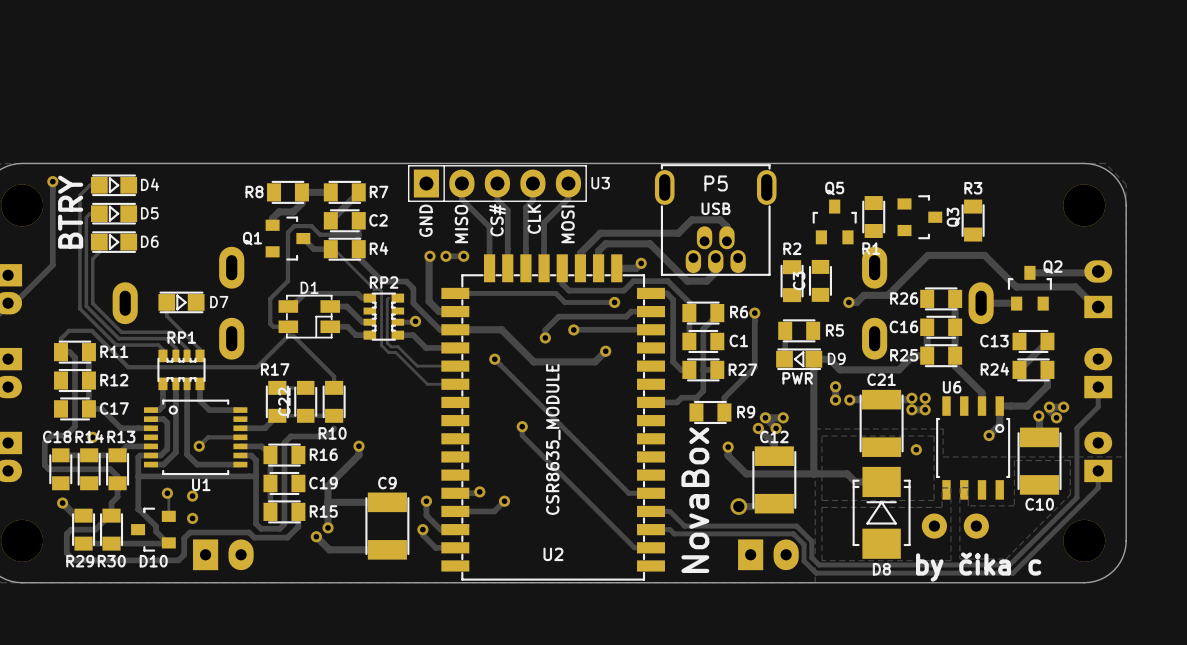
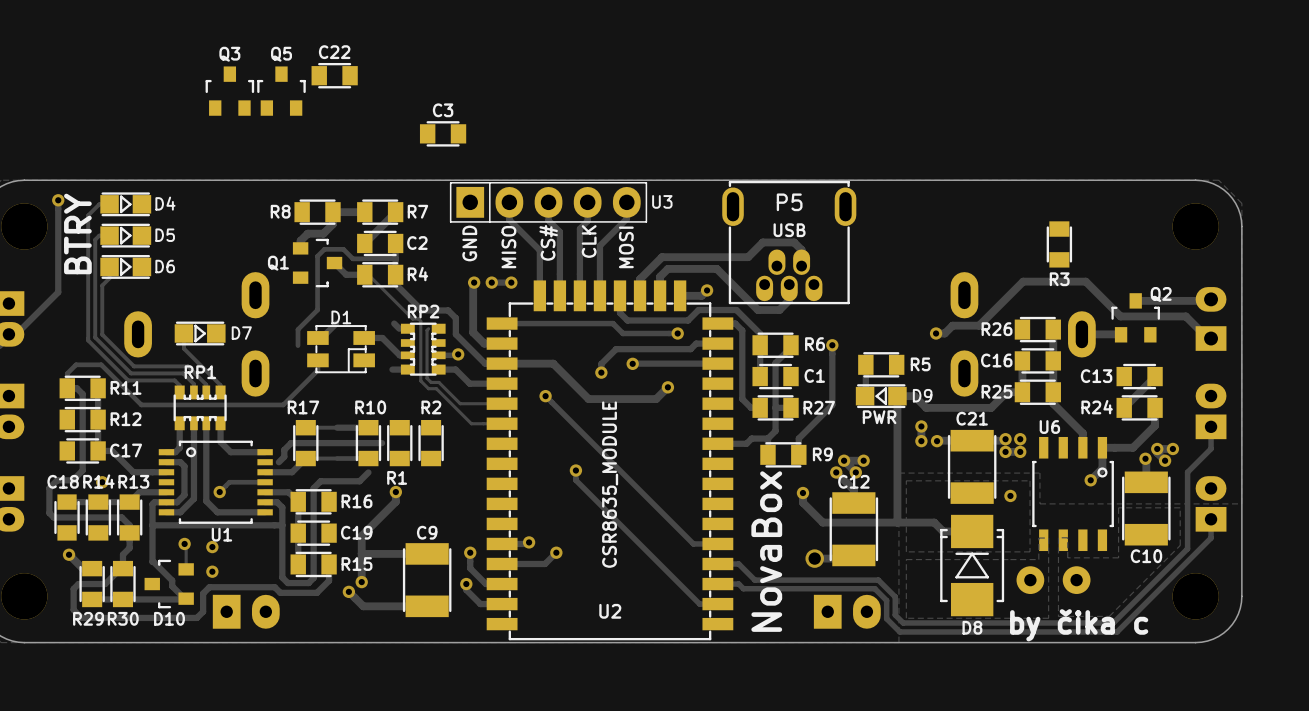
R3 name position: R3 (973, 188) -> R3 (1059, 279)
R1 position: (873, 217) -> (399, 443)
Q3 rotation: 0° (919, 217) -> 90° counterclockwise (229, 91)
Q3 position: (919, 217) -> (229, 91)
R3 position: (973, 220) -> (1059, 244)
Q5 position: (834, 221) -> (281, 91)
C3 rotation: 0° (820, 280) -> 90° clockwise (443, 133)
C3 position: (820, 280) -> (443, 133)
R2 position: (792, 281) -> (431, 443)
track: (304, 293) (357, 293) -> none
track: (270, 313) (270, 323) (273, 326) (288, 326) -> none
track: (330, 326) (347, 326) (355, 335) -> none
track: (288, 335) (293, 335) (334, 376) (334, 387) -> (337, 427) (368, 427)
C22 rotation: 0° (305, 401) -> 90° clockwise (334, 75)
C22 position: (305, 401) -> (334, 75)
track: none -> (382, 443) (291, 443) (284, 449) (284, 456) (278, 462)
R10 name position: R10 (332, 433) -> R10 (370, 407)

